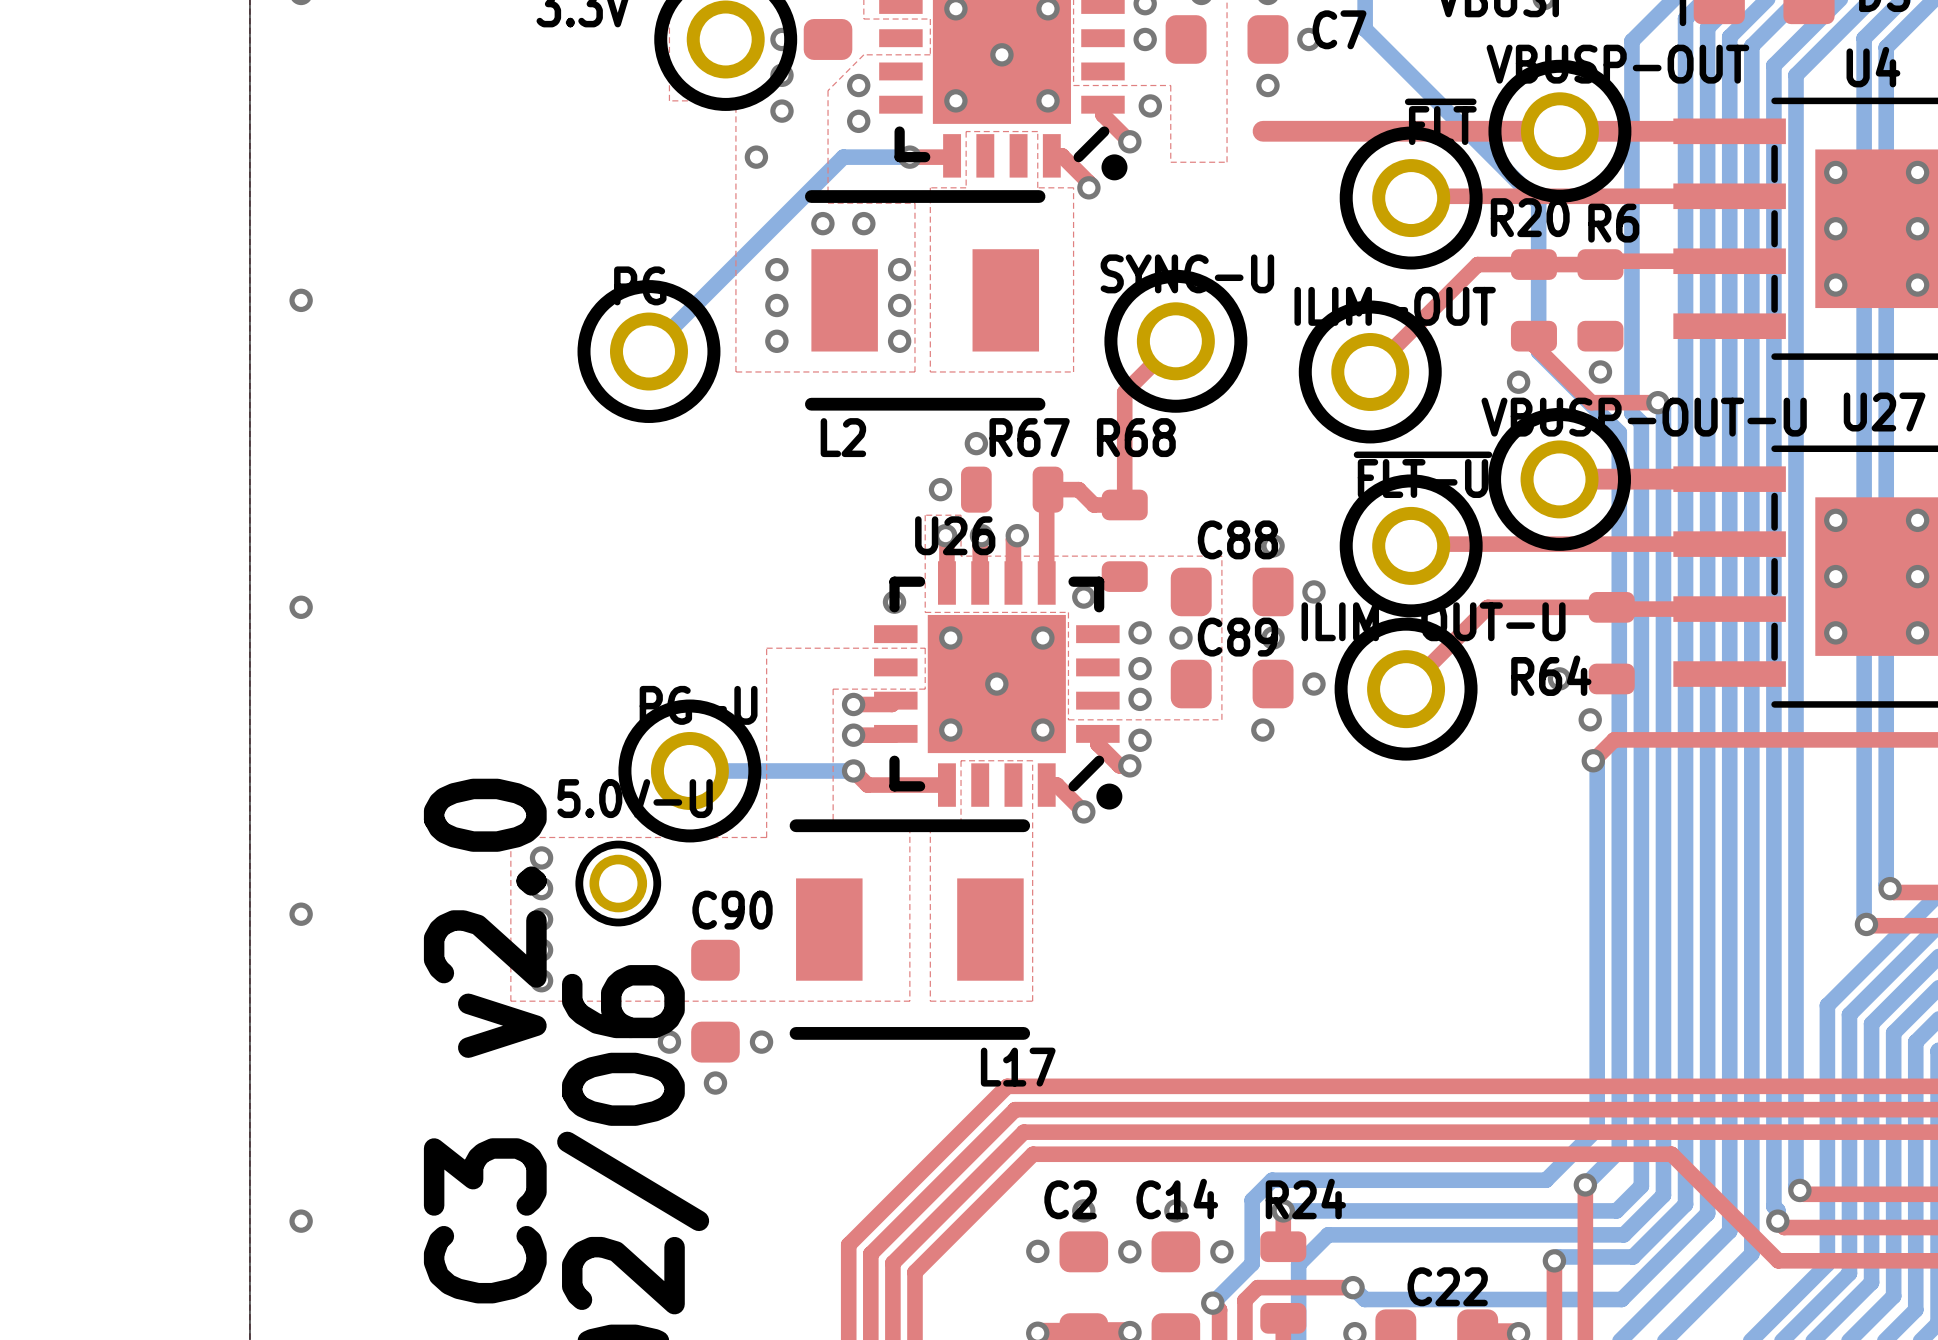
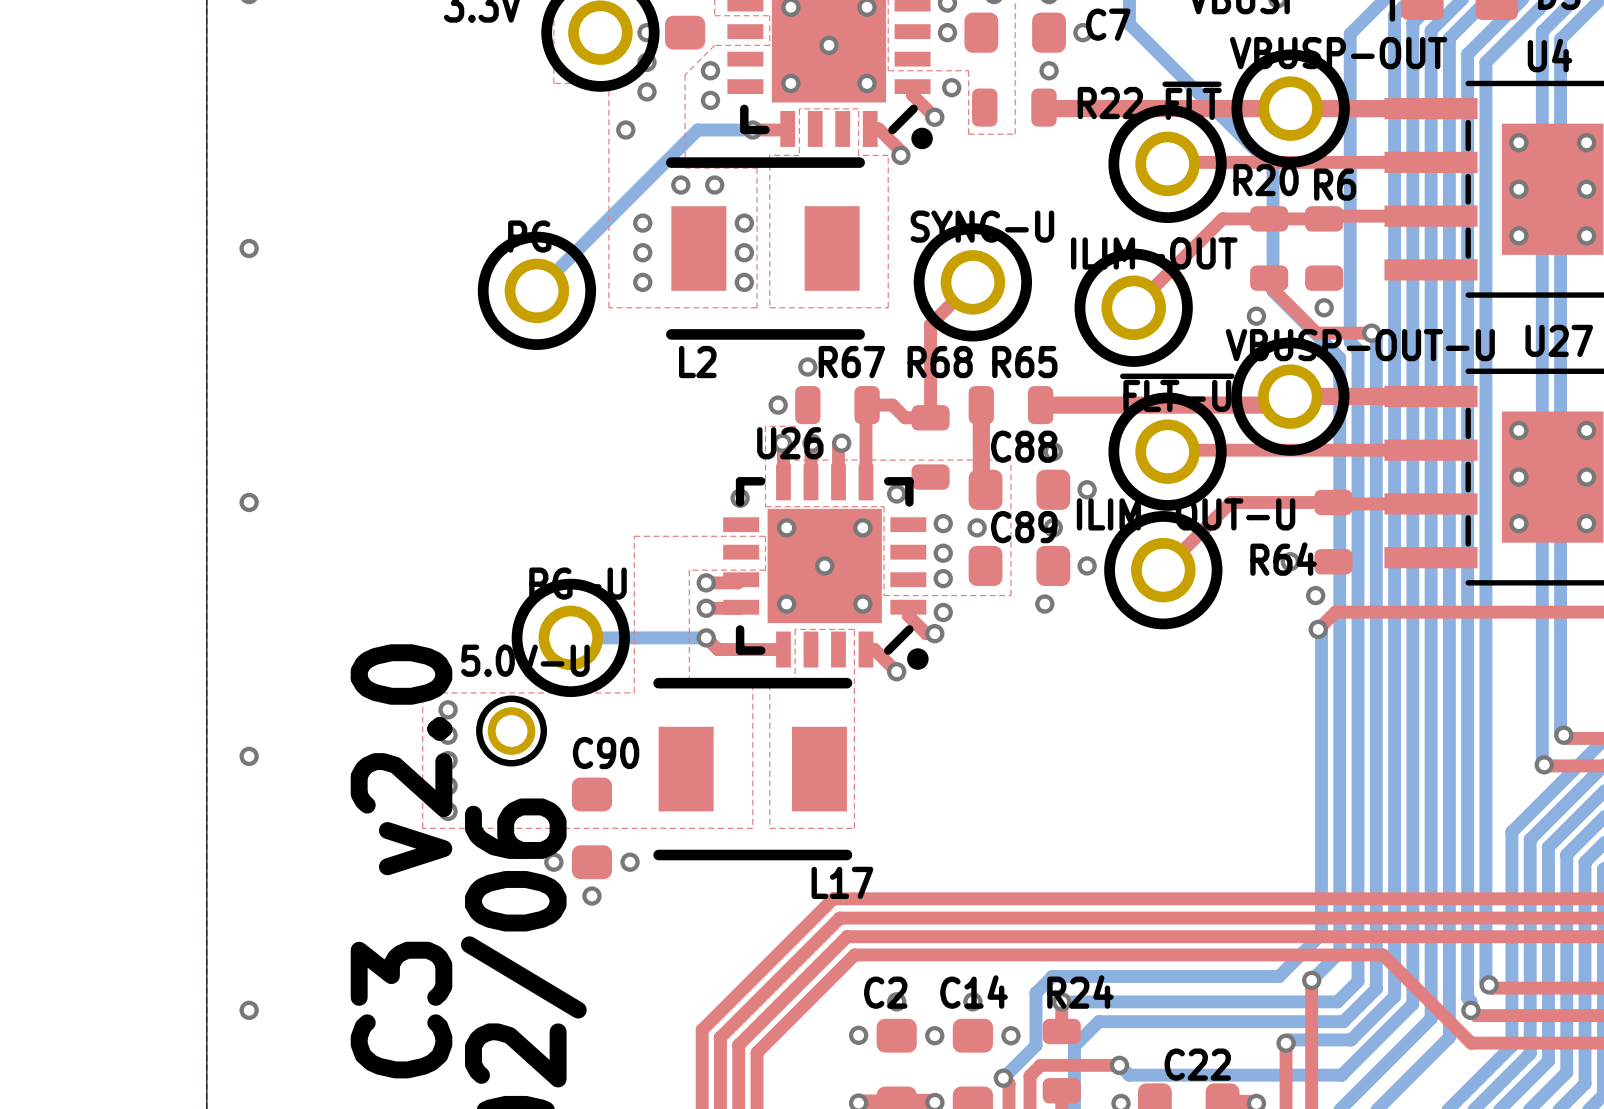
R22: none -> (1014, 107)
top track: none -> (981, 405) (981, 485)
R65: none -> (1010, 405)
top track: none -> (1040, 405) (1281, 405)

